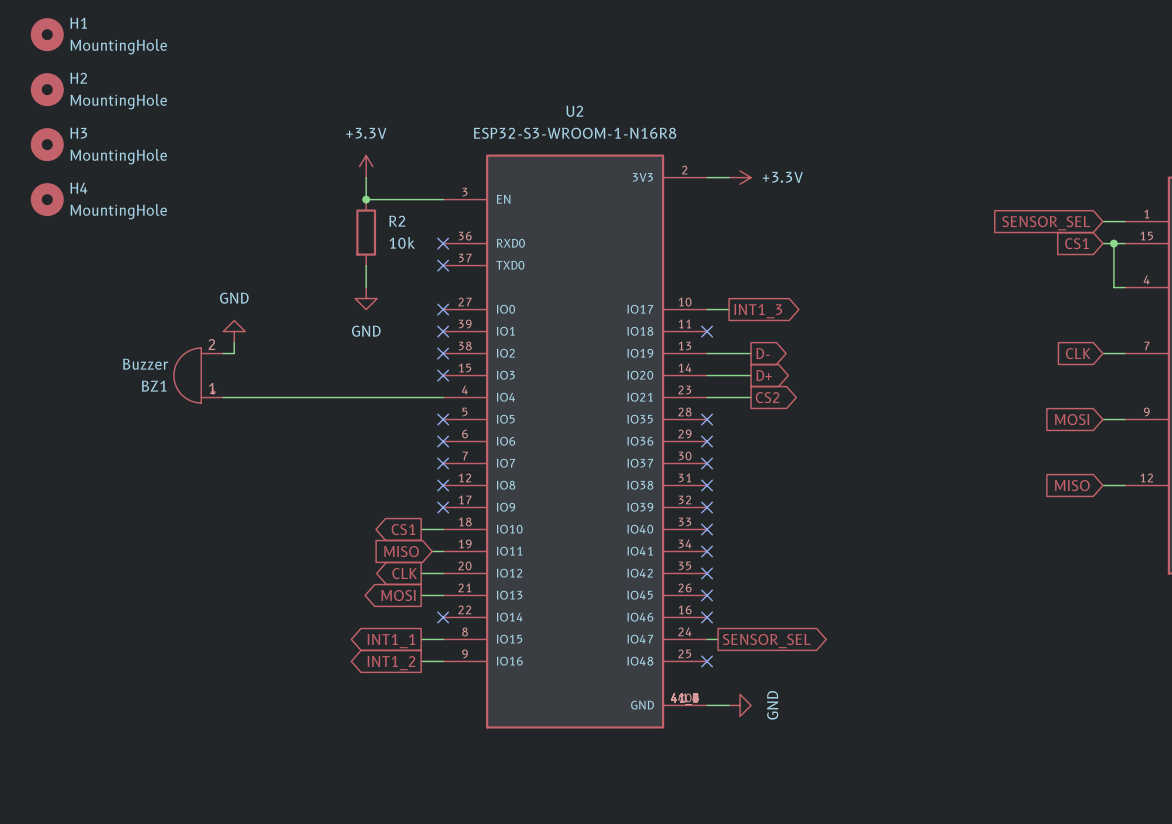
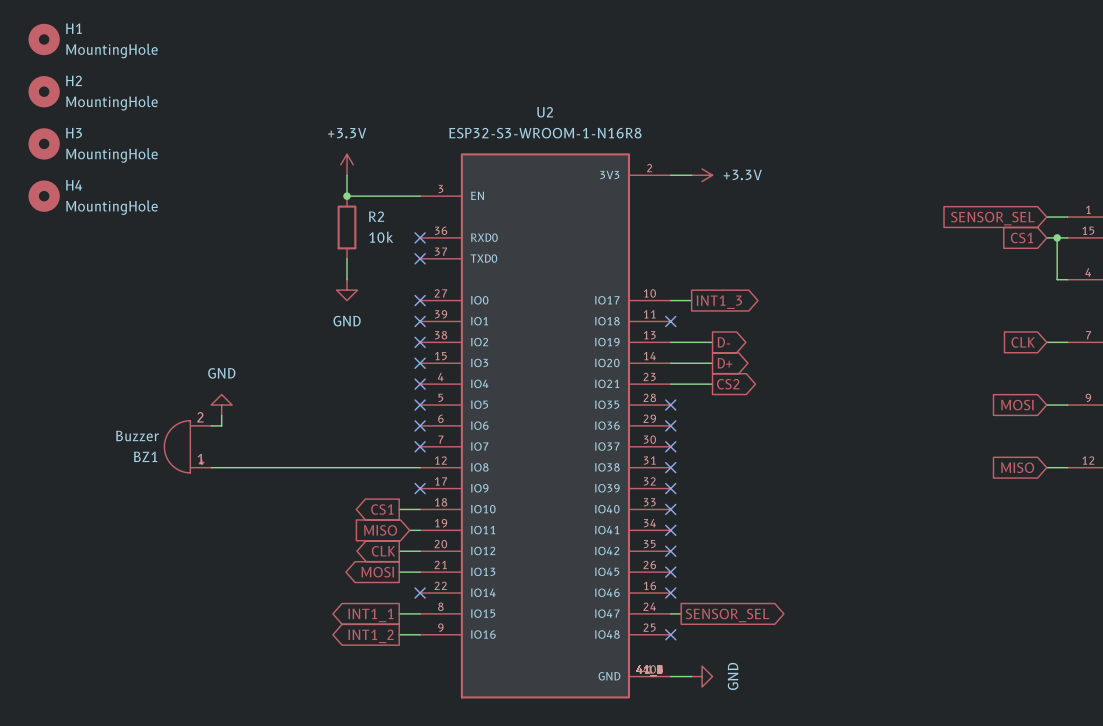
power symbol position: GND (234, 331) -> GND (221, 405)
wire: (234, 342) (234, 353) (223, 353) -> (221, 415) (221, 425) (211, 425)
BZ1 position: (198, 375) -> (187, 446)
wire: (223, 397) (443, 397) -> (211, 467) (420, 467)
no-connect mark: none -> (420, 384)
no-connect mark: (443, 485) -> none

